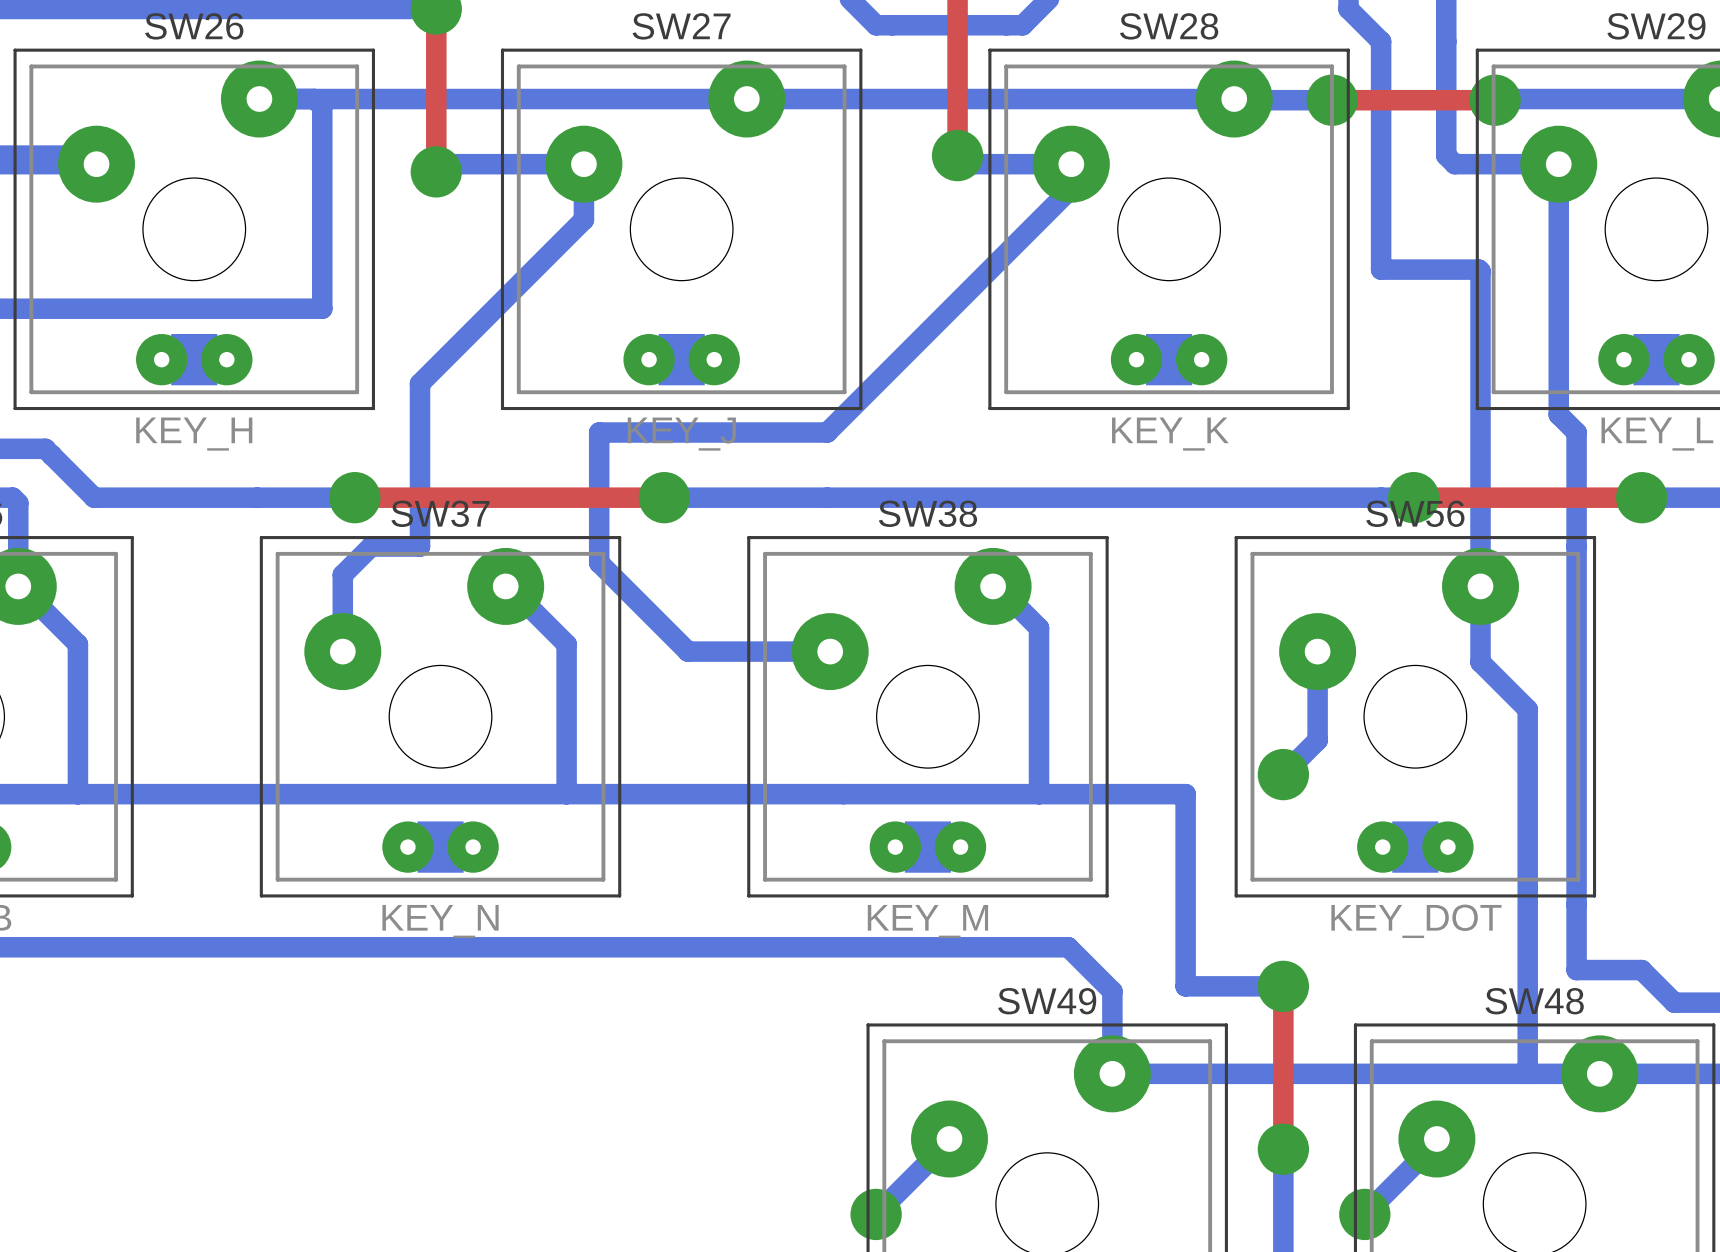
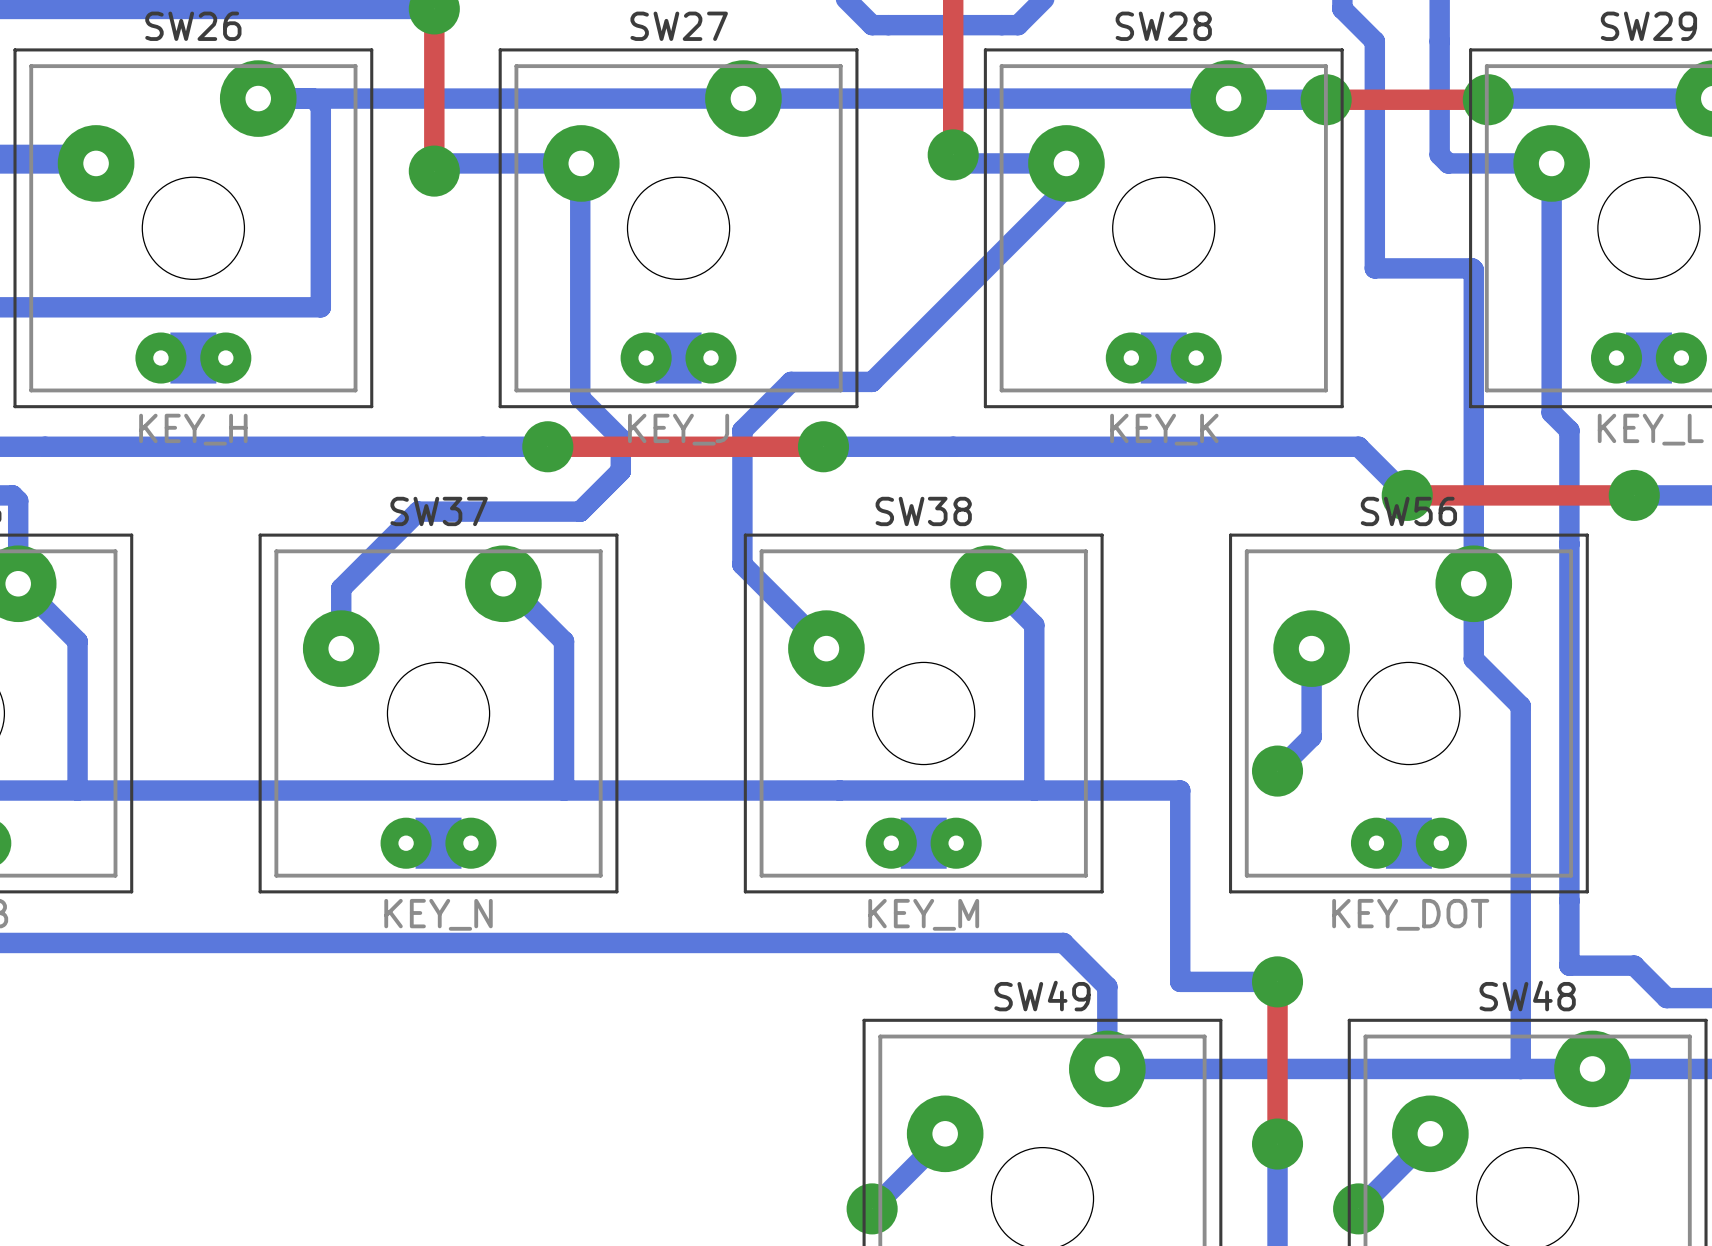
bottom track: (583, 164) (583, 219) (420, 383) (420, 546) (371, 546) (342, 574) (342, 591) -> (581, 163) (580, 398) (620, 438) (620, 471) (580, 511) (418, 511) (341, 588)
bottom track: (876, 383) (827, 432) (599, 432) (599, 562) (687, 651) (830, 651) -> (872, 381) (791, 381) (742, 430) (742, 564) (826, 648)
bottom track: (45, 448) (94, 497) (354, 497) -> (45, 446) (547, 446)
top track: none -> (547, 446) (823, 446)
via: none -> (547, 446)
via: none -> (823, 446)
top track: (354, 497) (664, 497) -> none
via: (354, 497) -> none
bottom track: (664, 497) (1413, 497) -> (823, 446) (1358, 446) (1407, 495)
via: (664, 497) -> none

